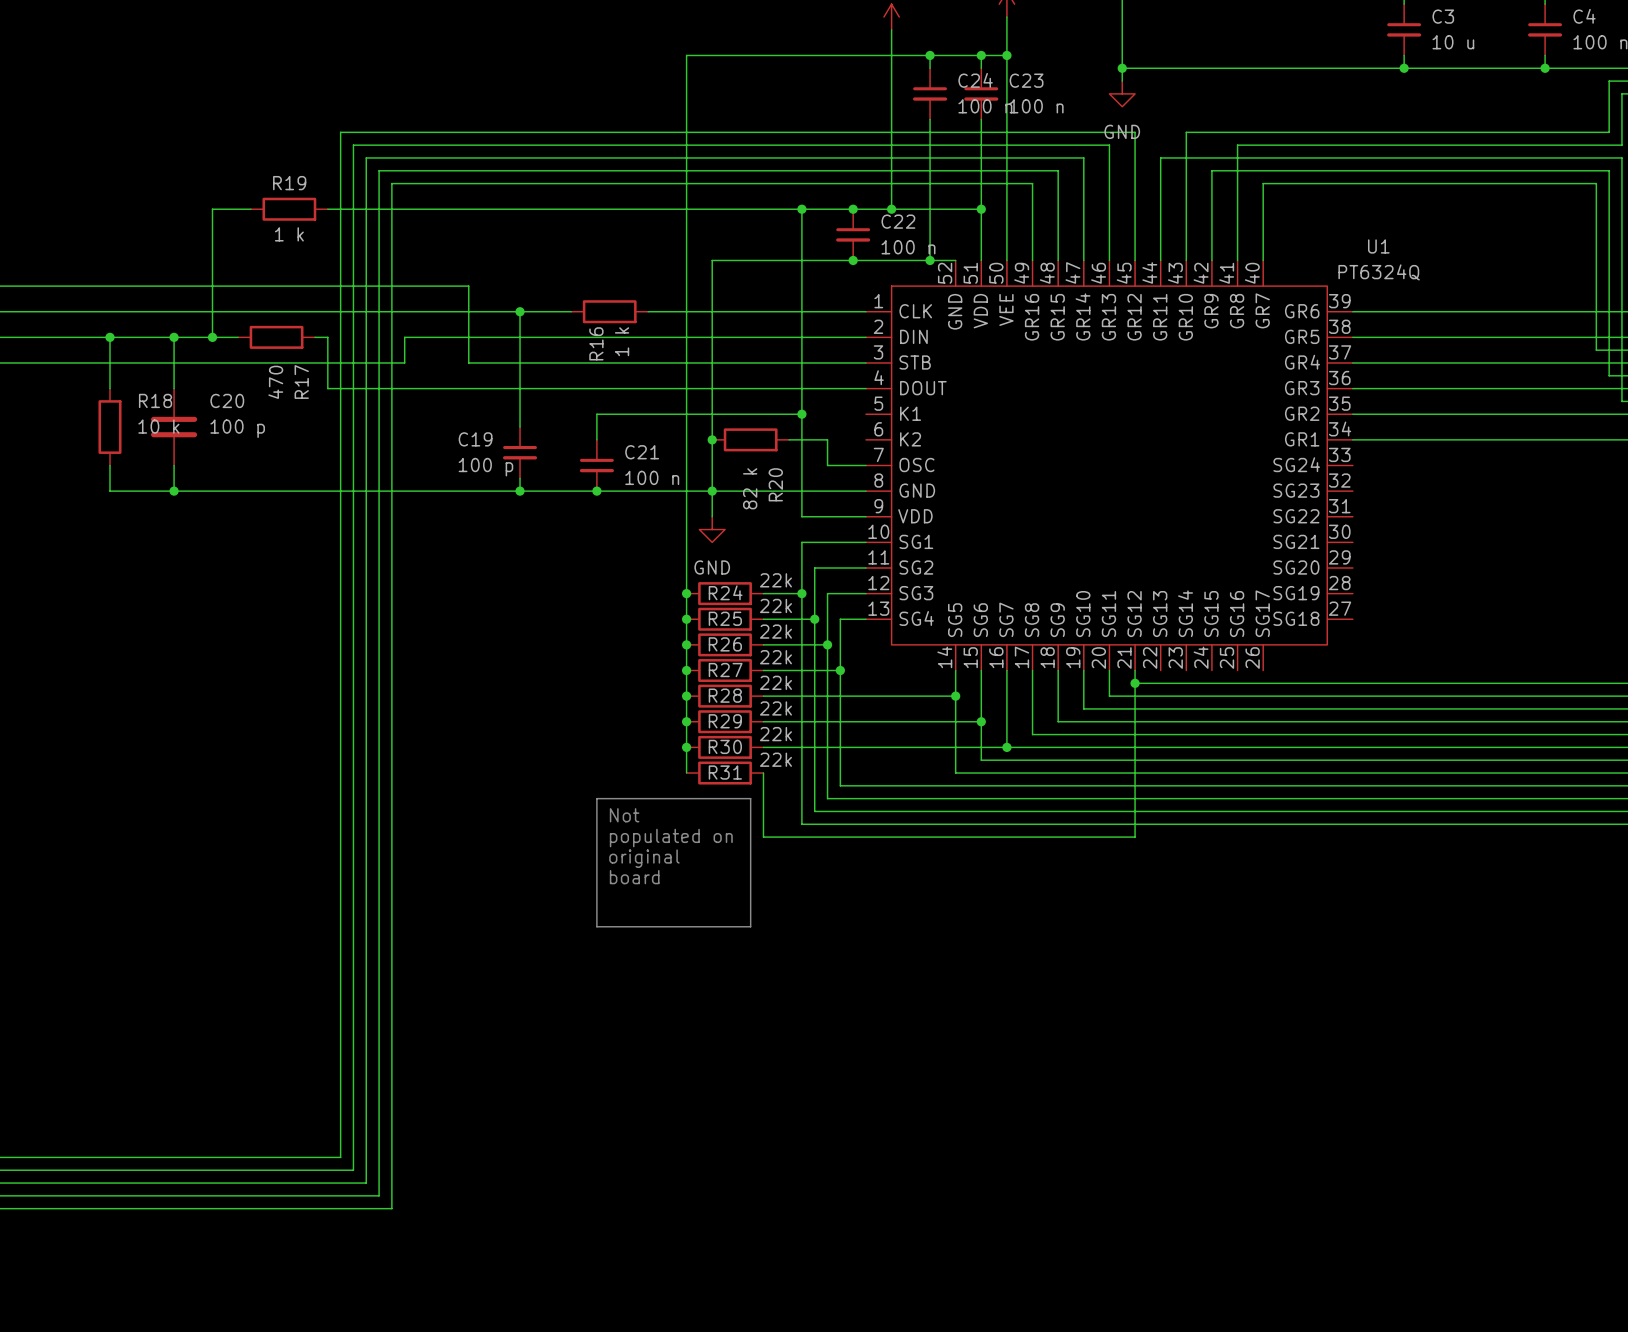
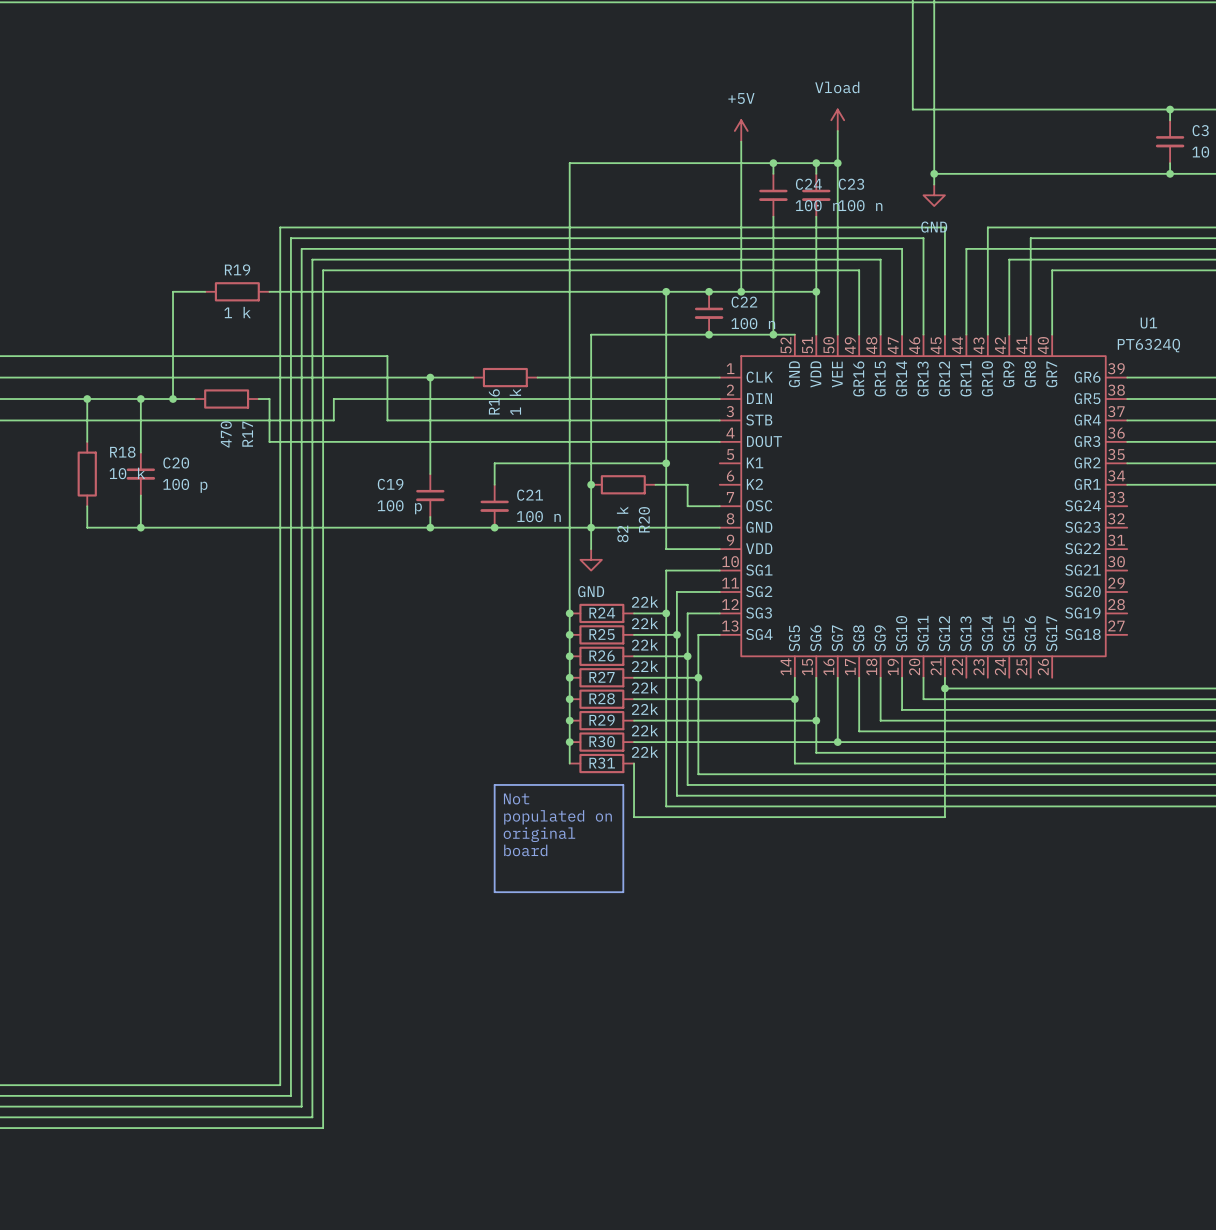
C20 symbol: [150, 388, 198, 466] -> [126, 452, 156, 496]

